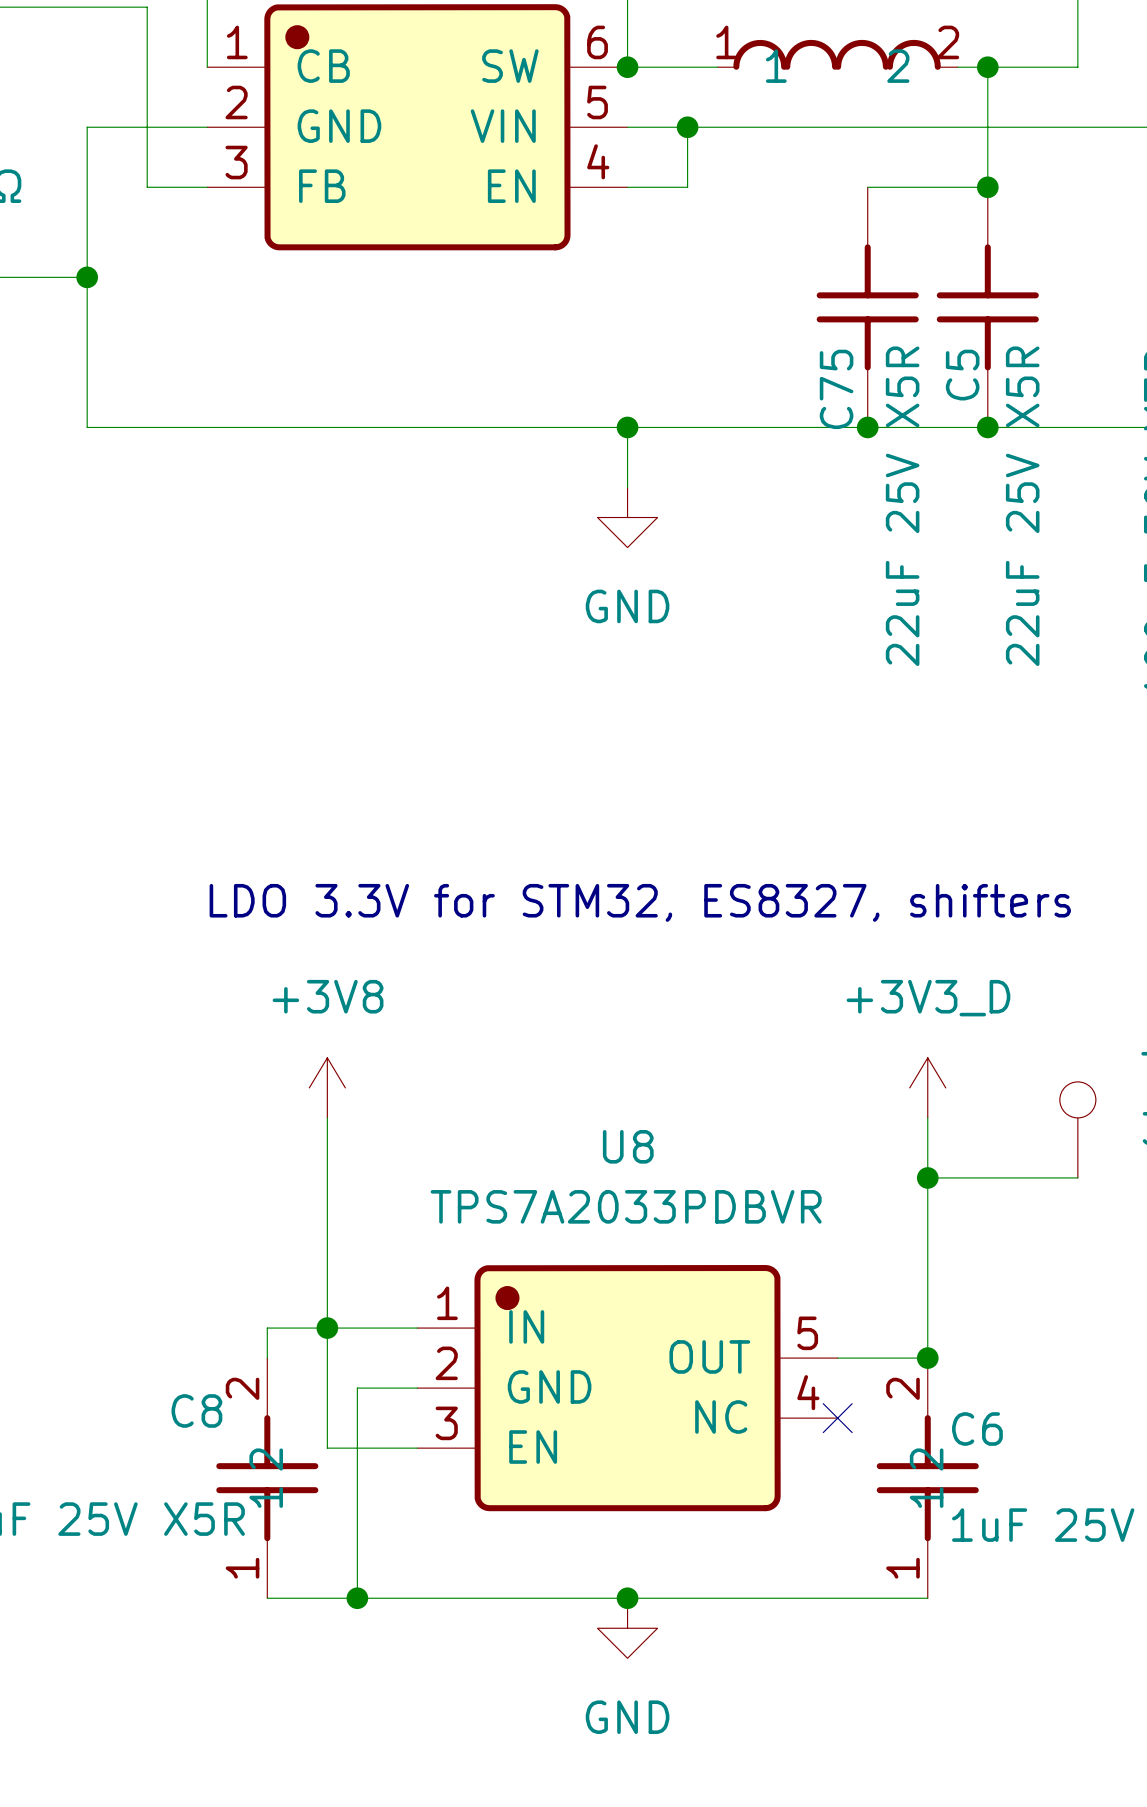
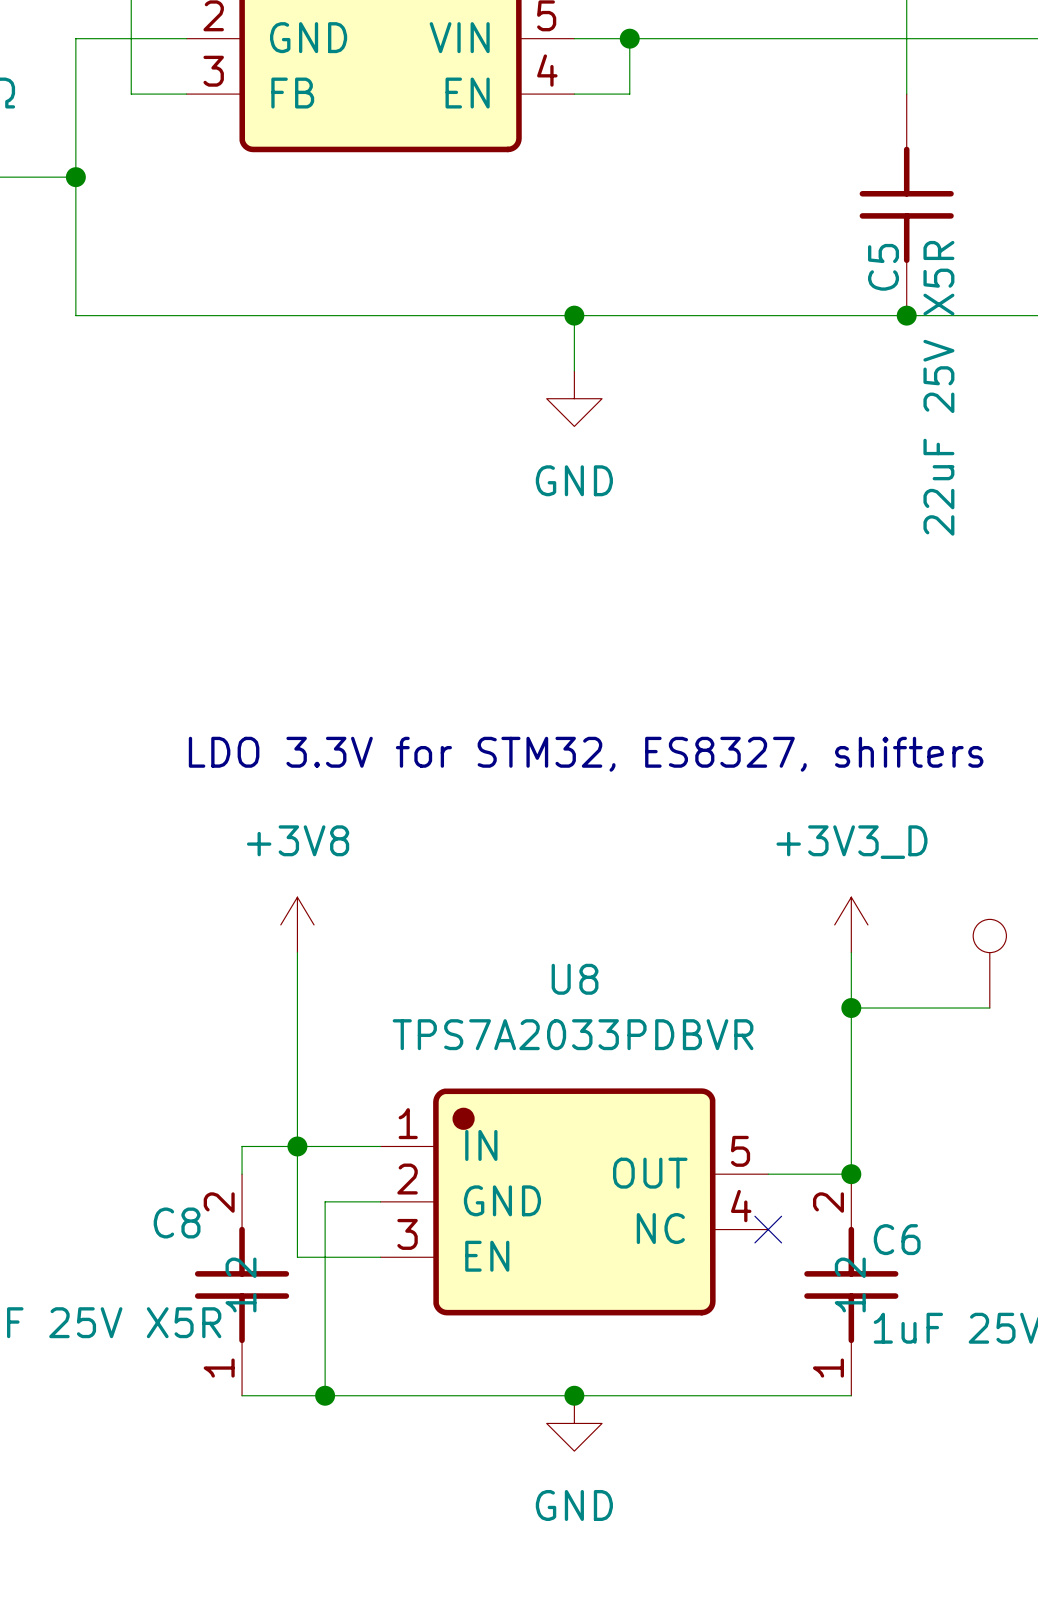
wire: (867, 187) (987, 187) -> none
junction: (987, 187) -> none
C75: 22uF 25V X5R (867, 307) -> none
junction: (867, 427) -> none

